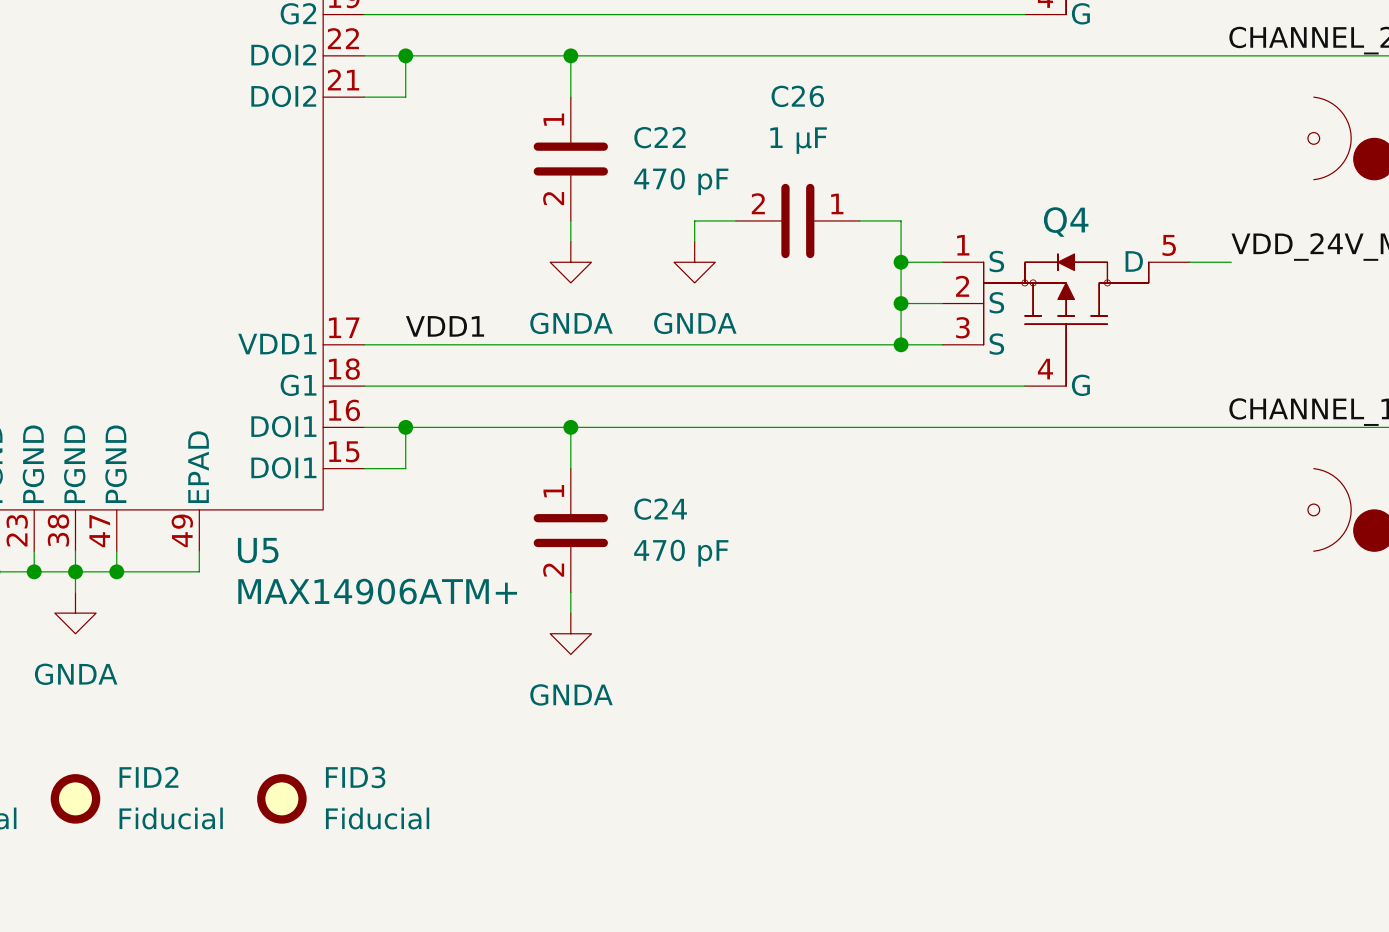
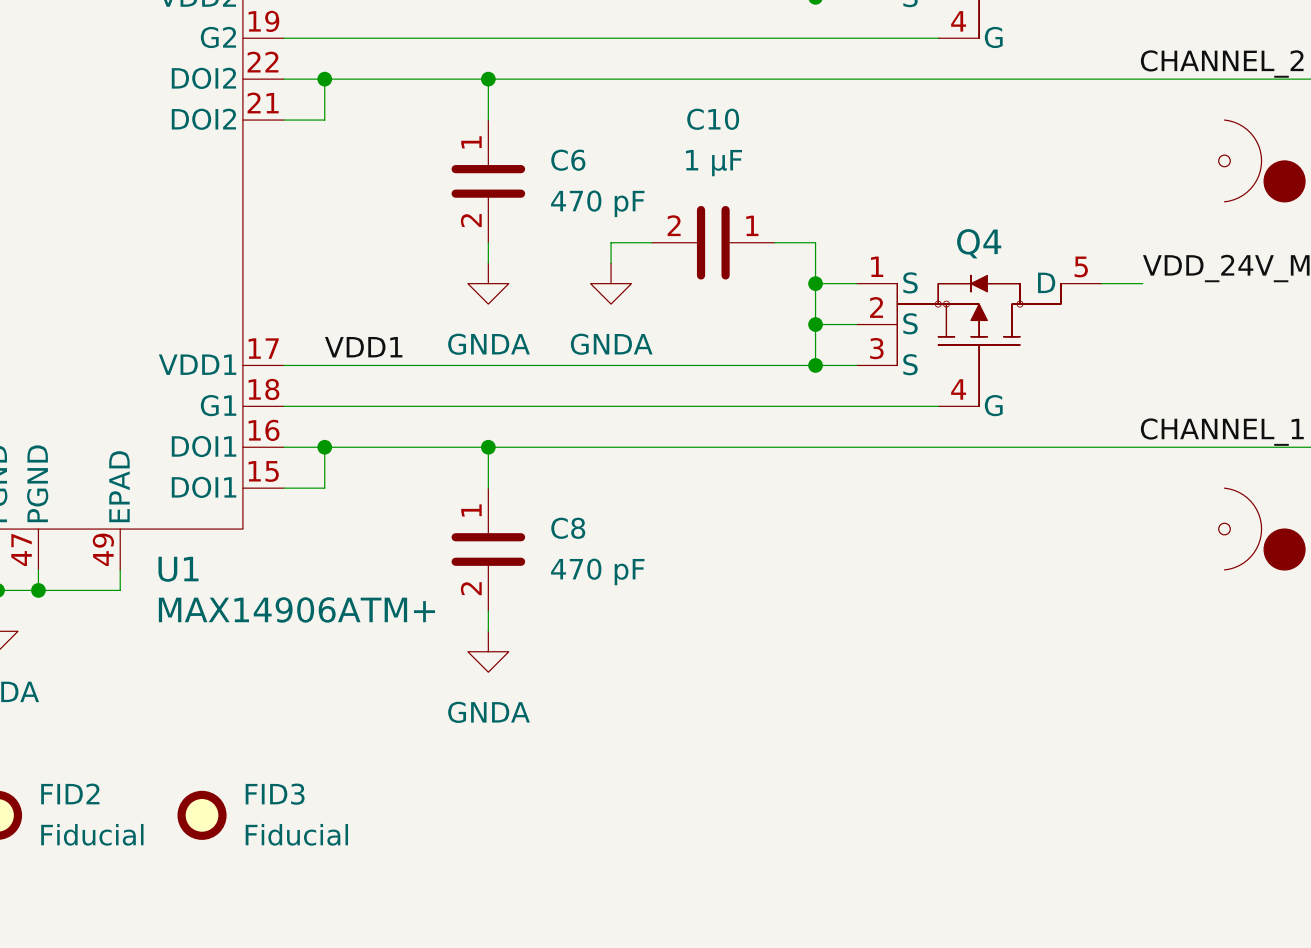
C26 name: C26 (797, 96) -> C10 (713, 119)
C22 name: C22 (660, 137) -> C6 (568, 160)
C24 name: C24 (660, 509) -> C8 (568, 528)
U5 name: U5 (258, 550) -> U1 (178, 569)

